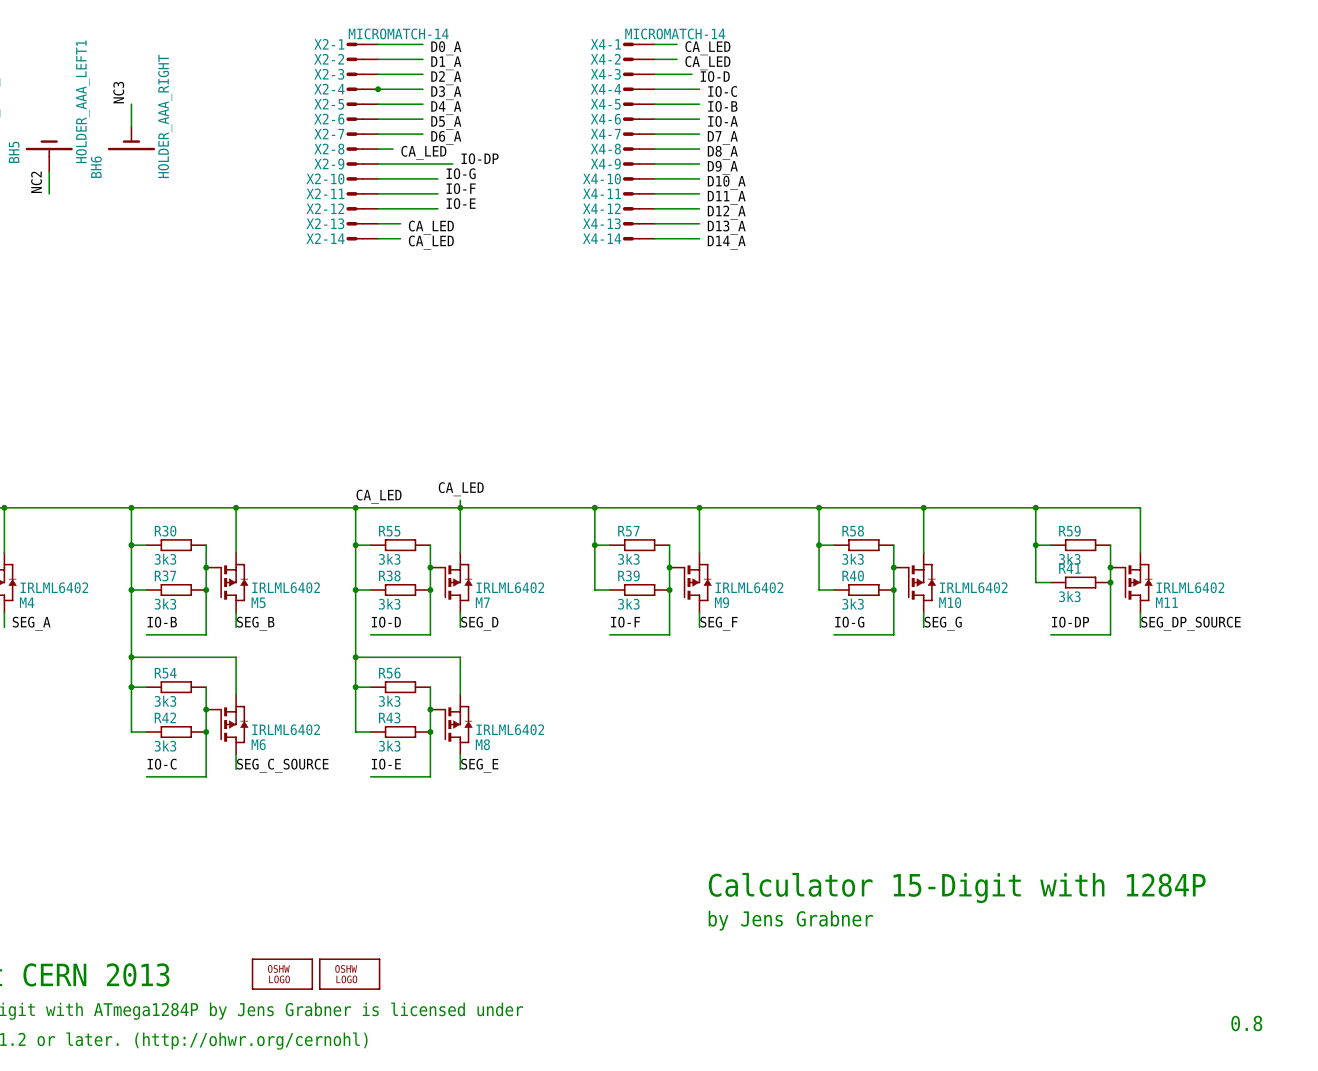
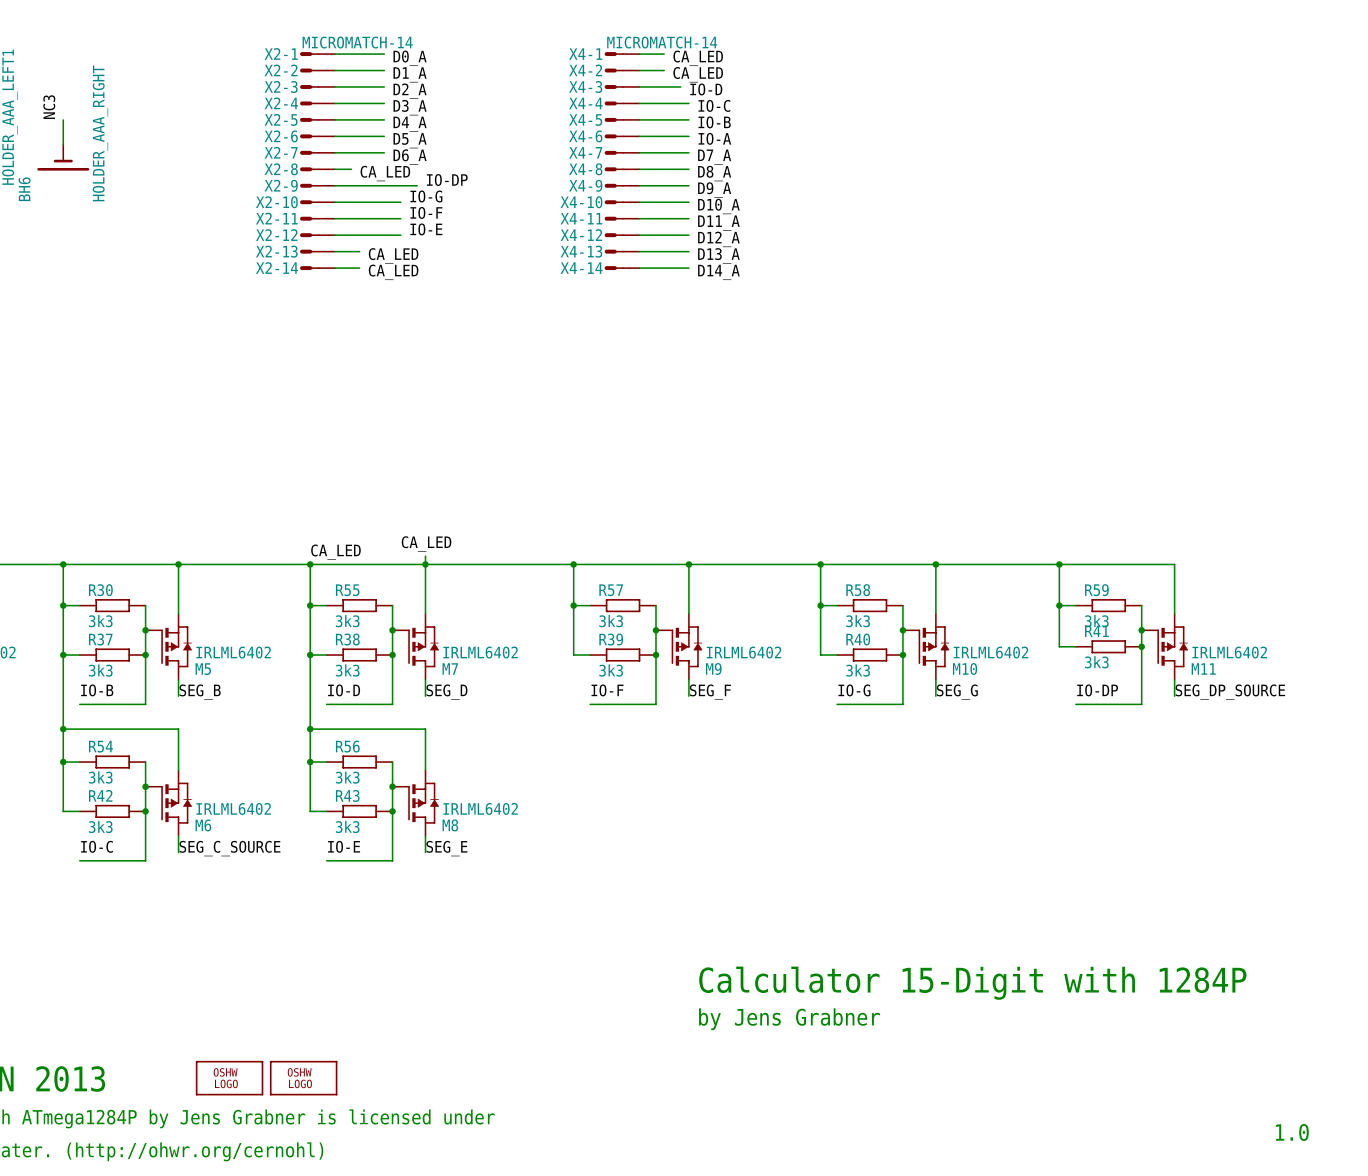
junction: (378, 89) -> none
text: 0.8 (1246, 1023) -> 1.0 (1292, 1132)

